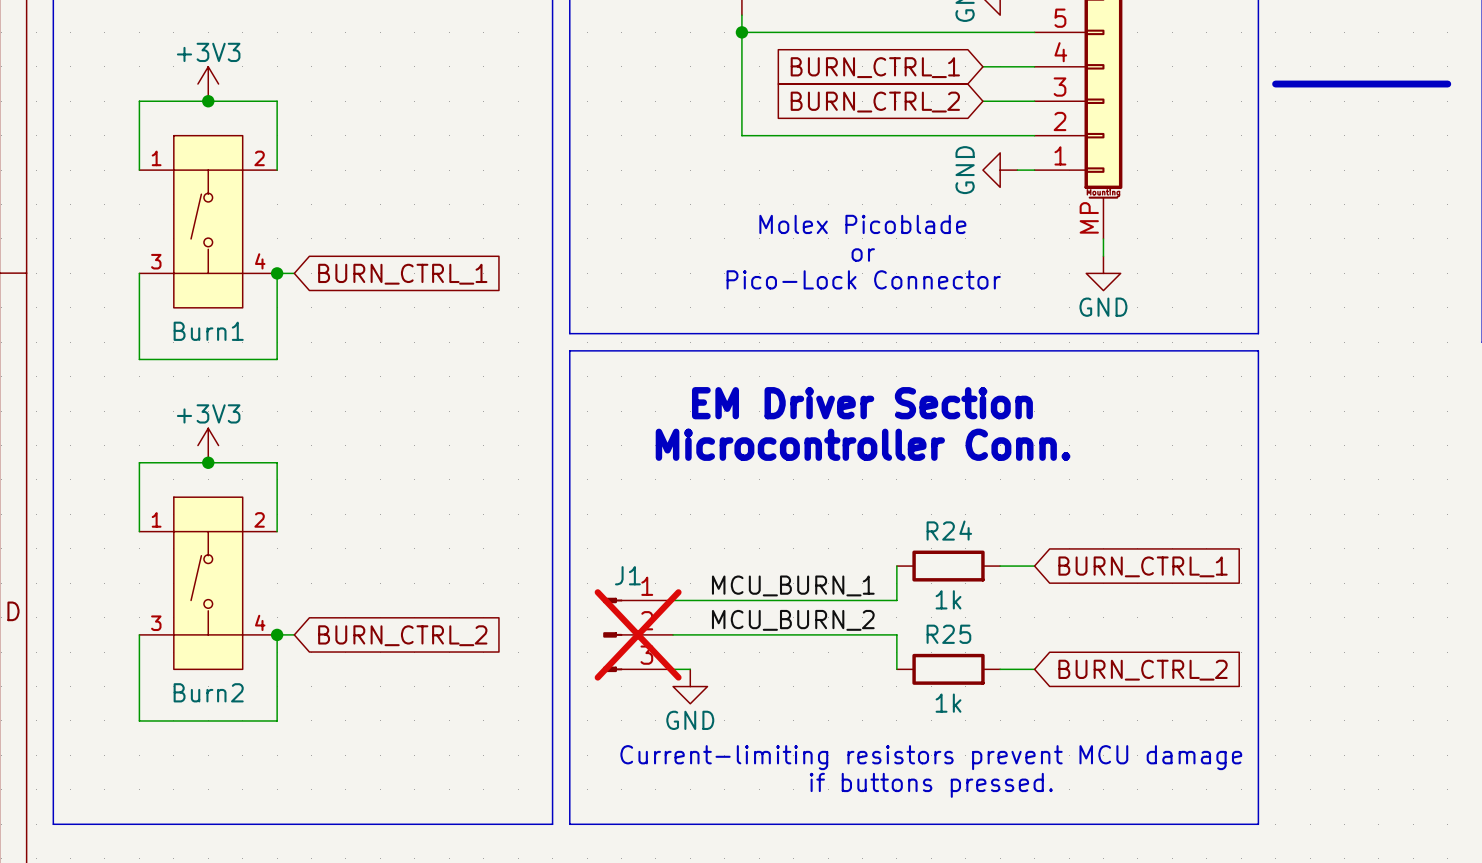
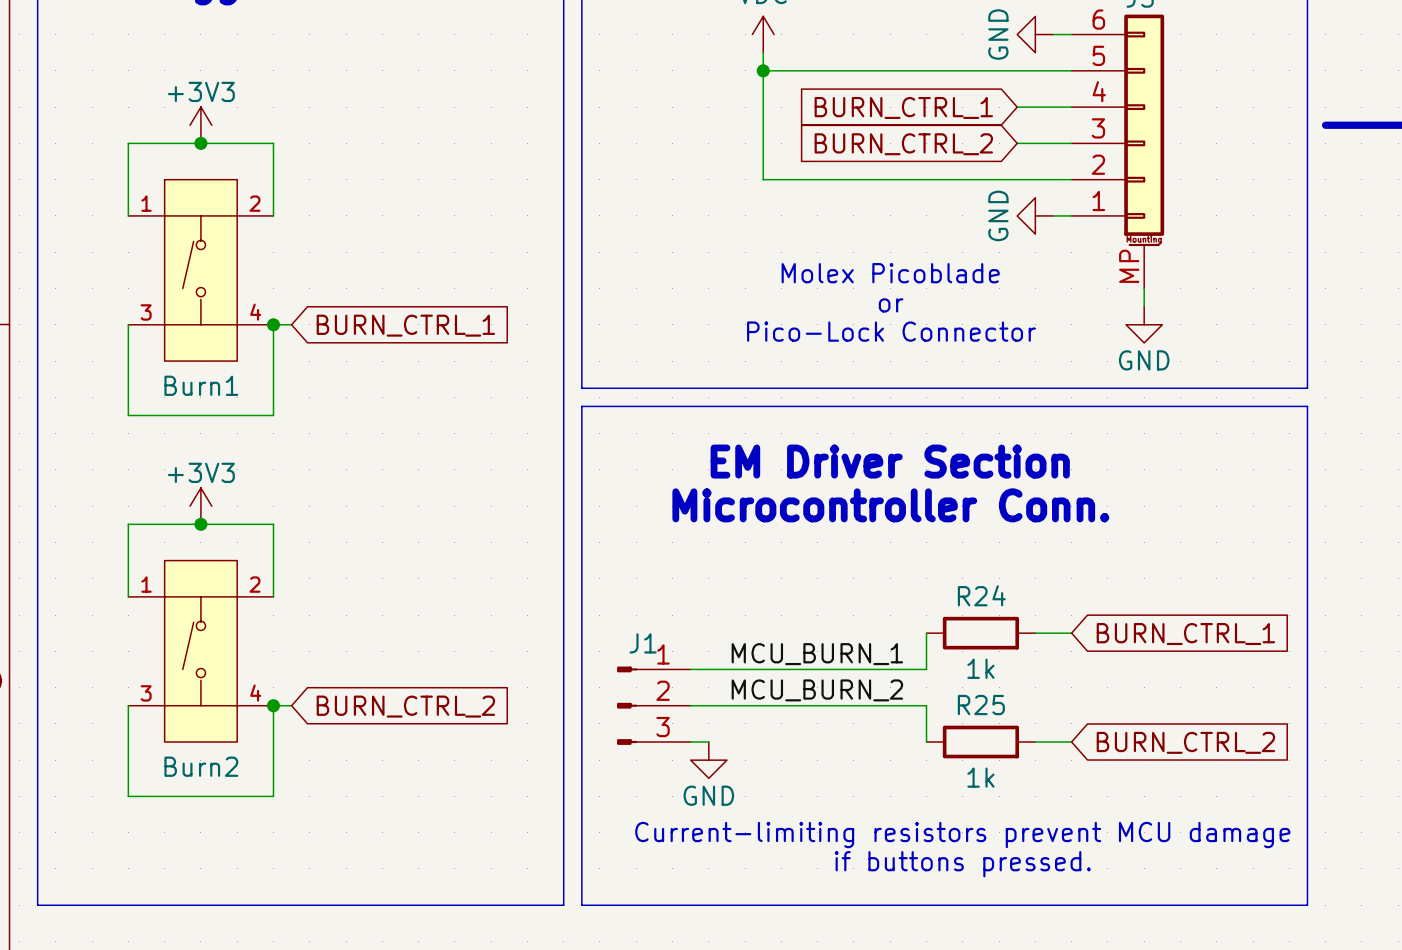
J1 do-not-place cross: (638, 634) -> none

